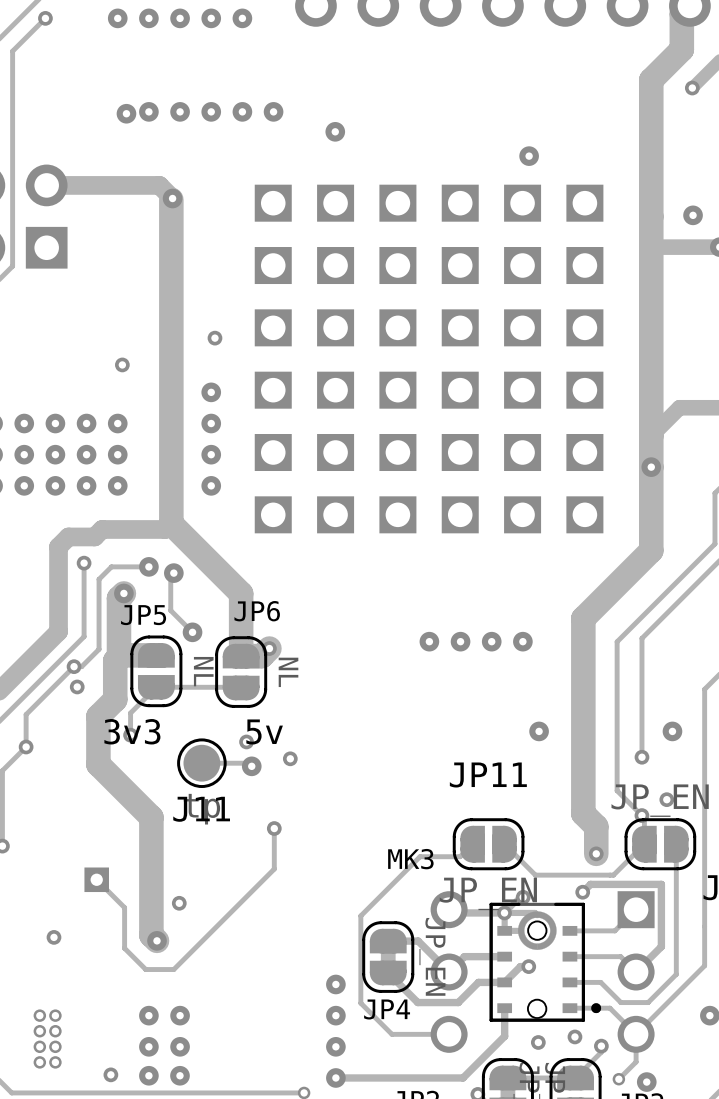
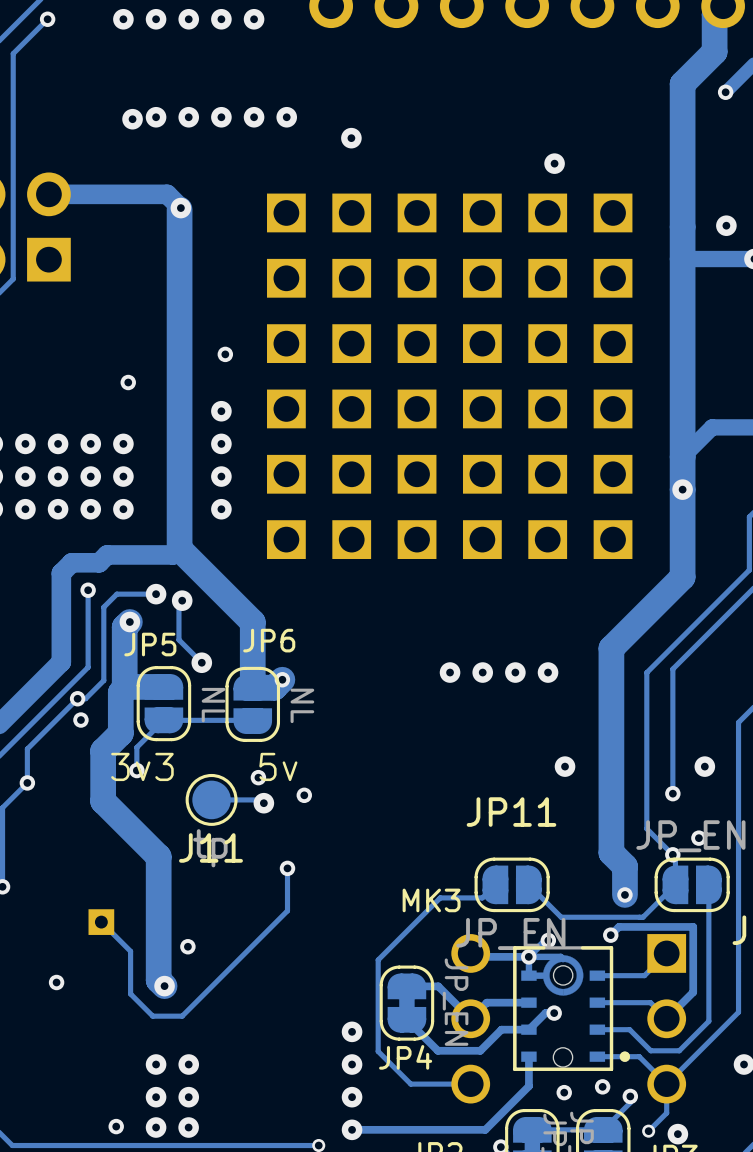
via: (39, 1015) -> none
via: (55, 1015) -> none
via: (39, 1031) -> none
via: (55, 1031) -> none
via: (39, 1046) -> none
via: (55, 1046) -> none
via: (39, 1062) -> none
via: (55, 1062) -> none

